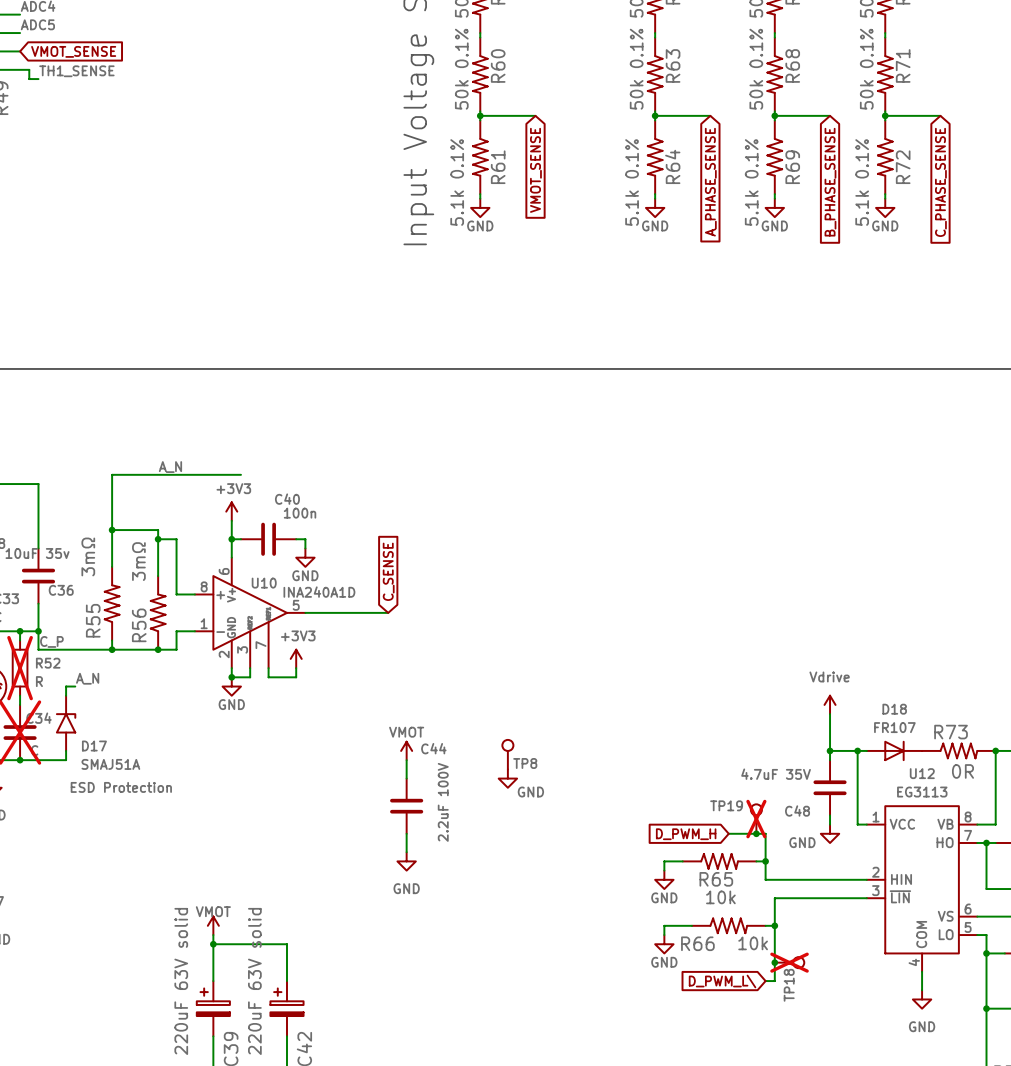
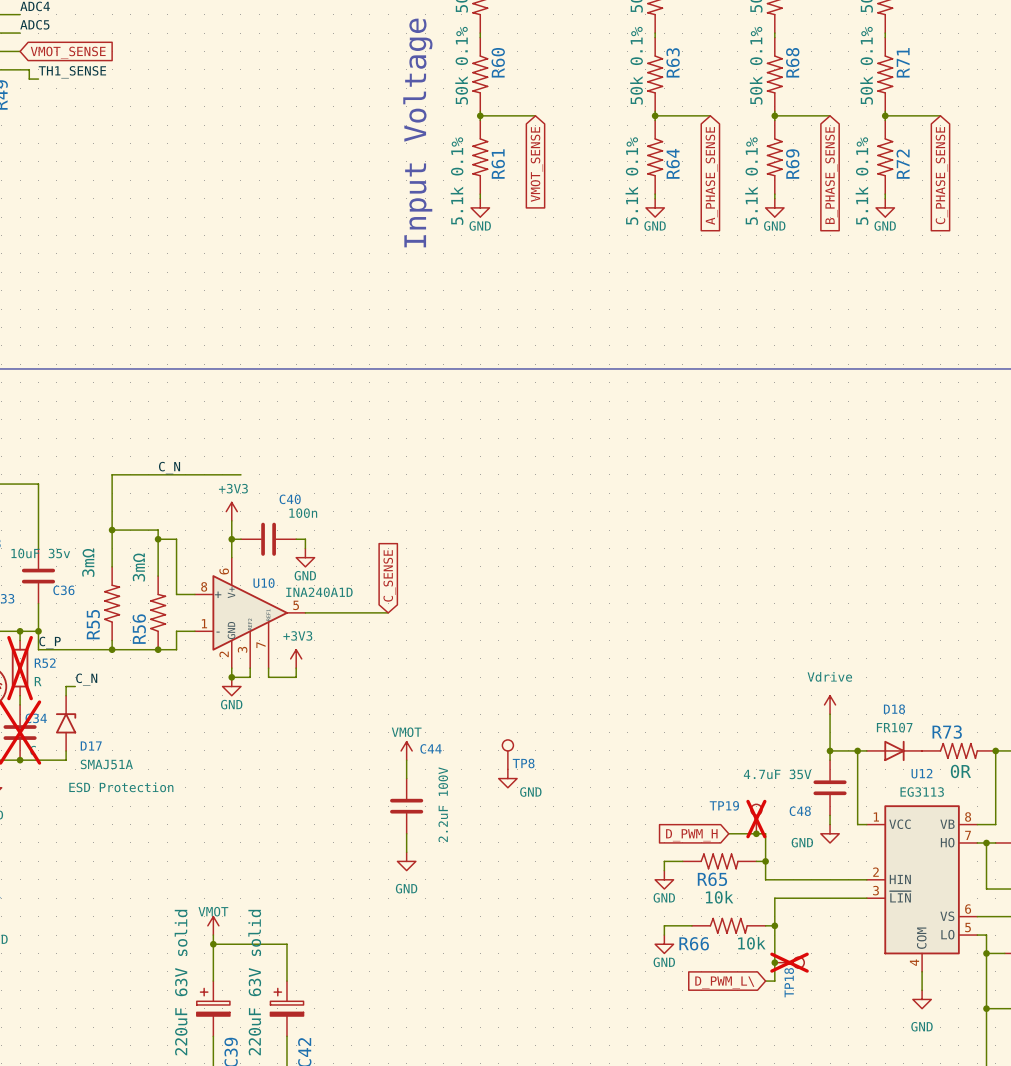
label: A_N (170, 467) -> C_N (169, 468)
label: A_N (87, 678) -> C_N (86, 679)

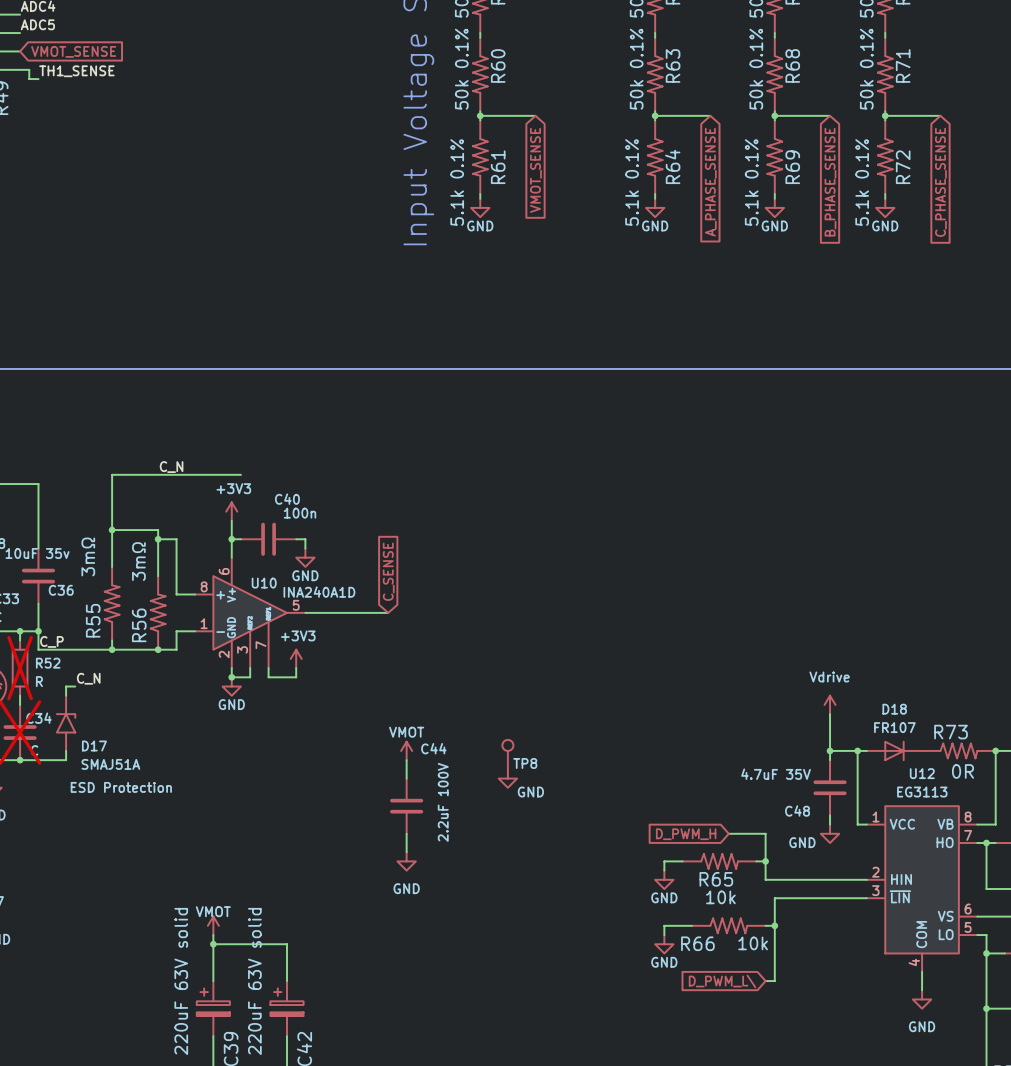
TP19: (756, 819) -> none
junction: (756, 833) -> none
junction: (774, 962) -> none
TP18: (789, 962) -> none

